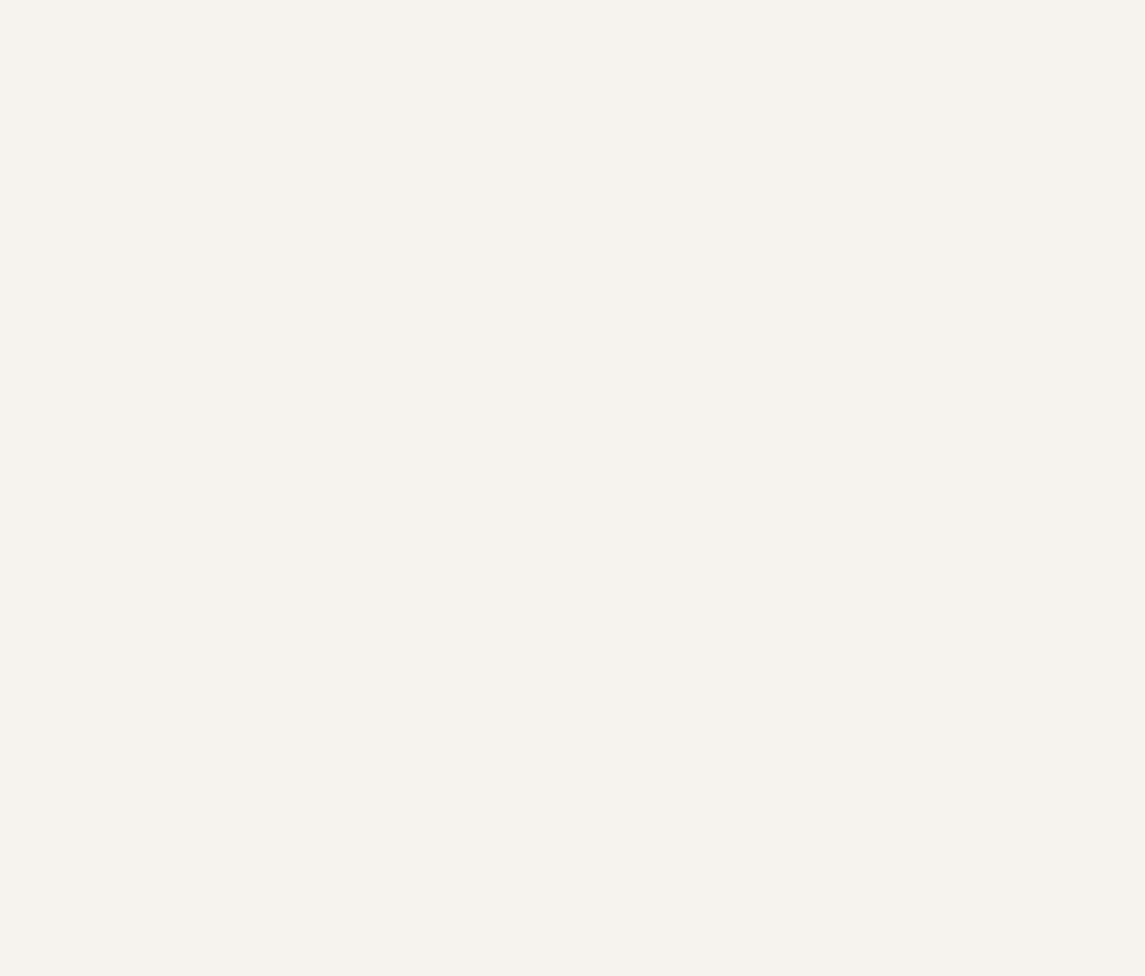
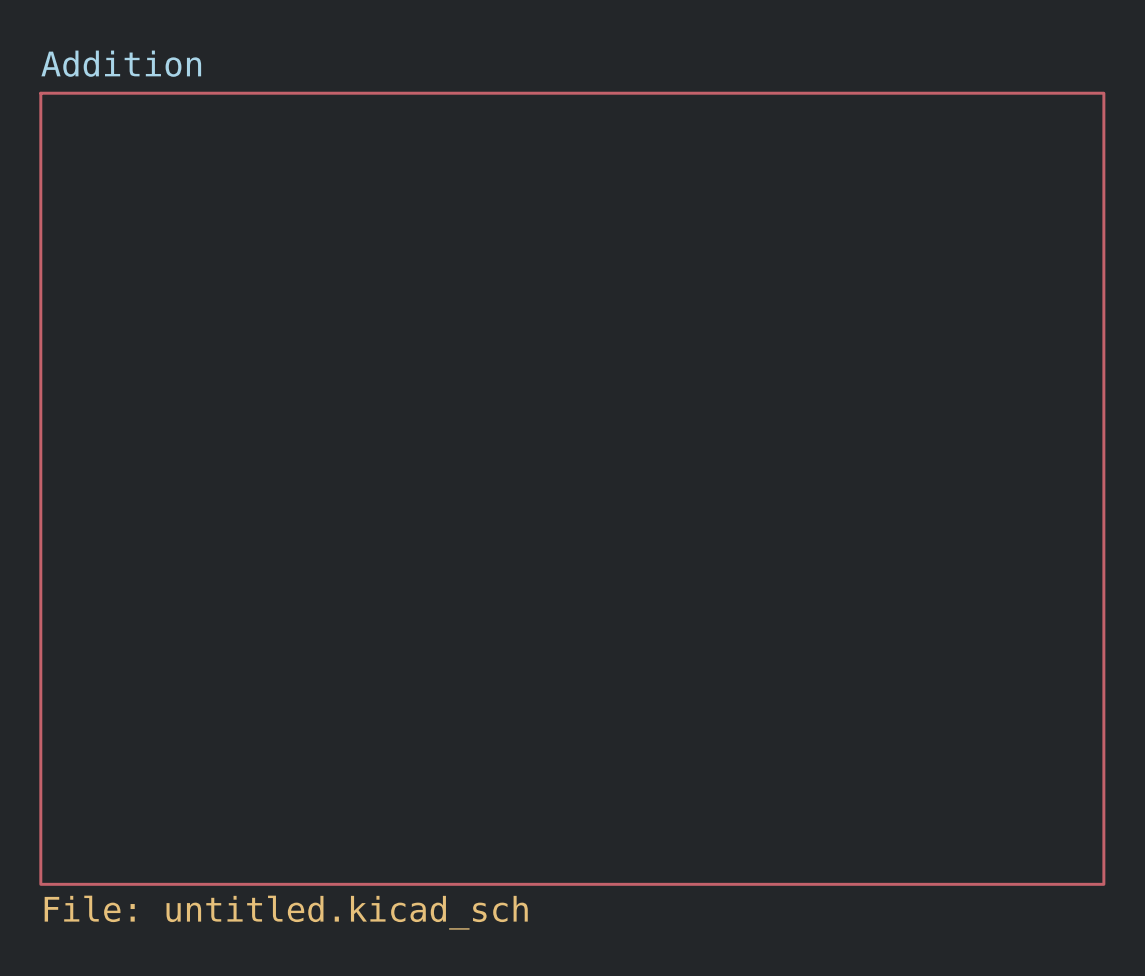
sheet Addition: none -> File: untitled.kicad_sch (572, 488)

